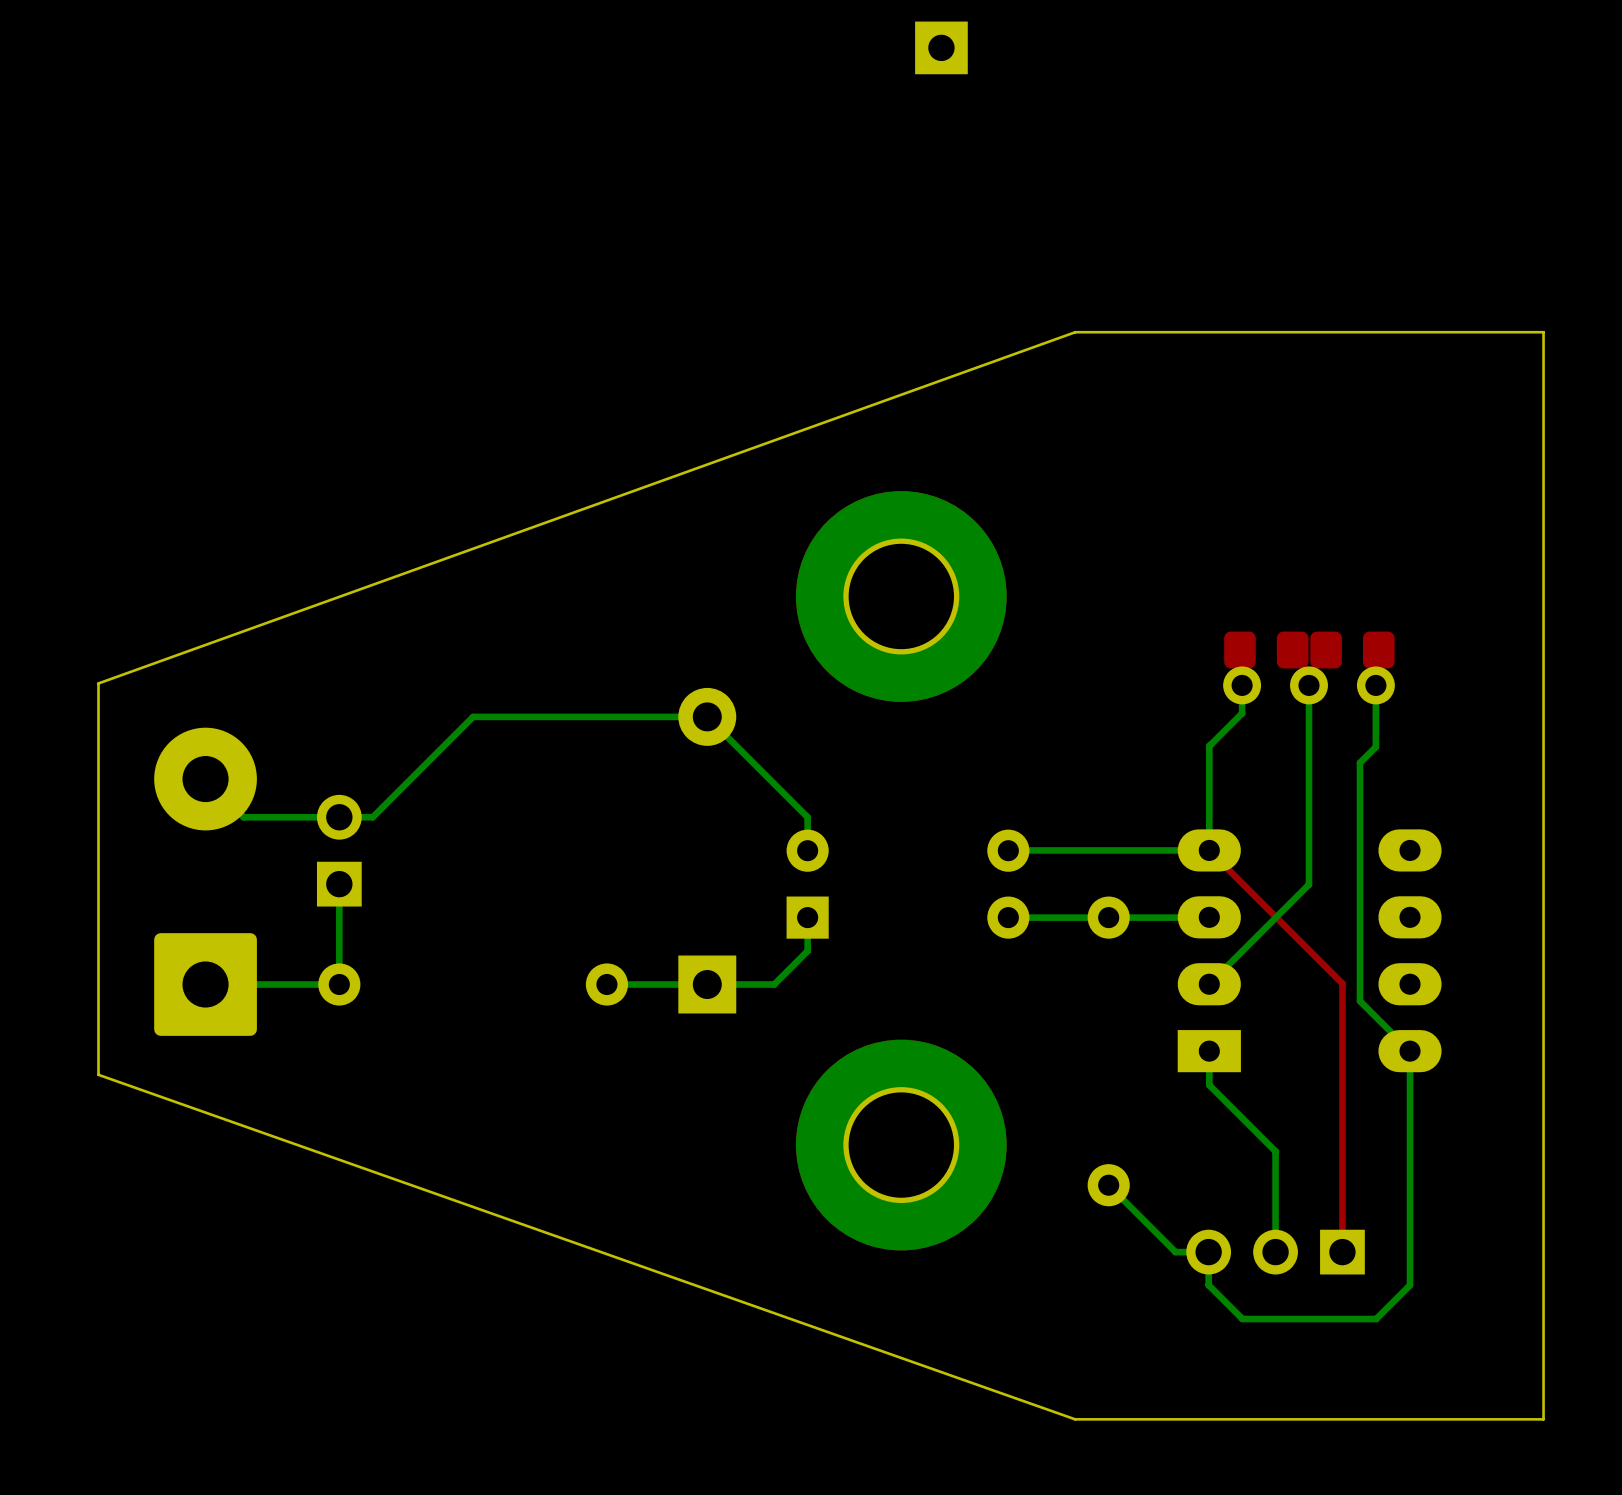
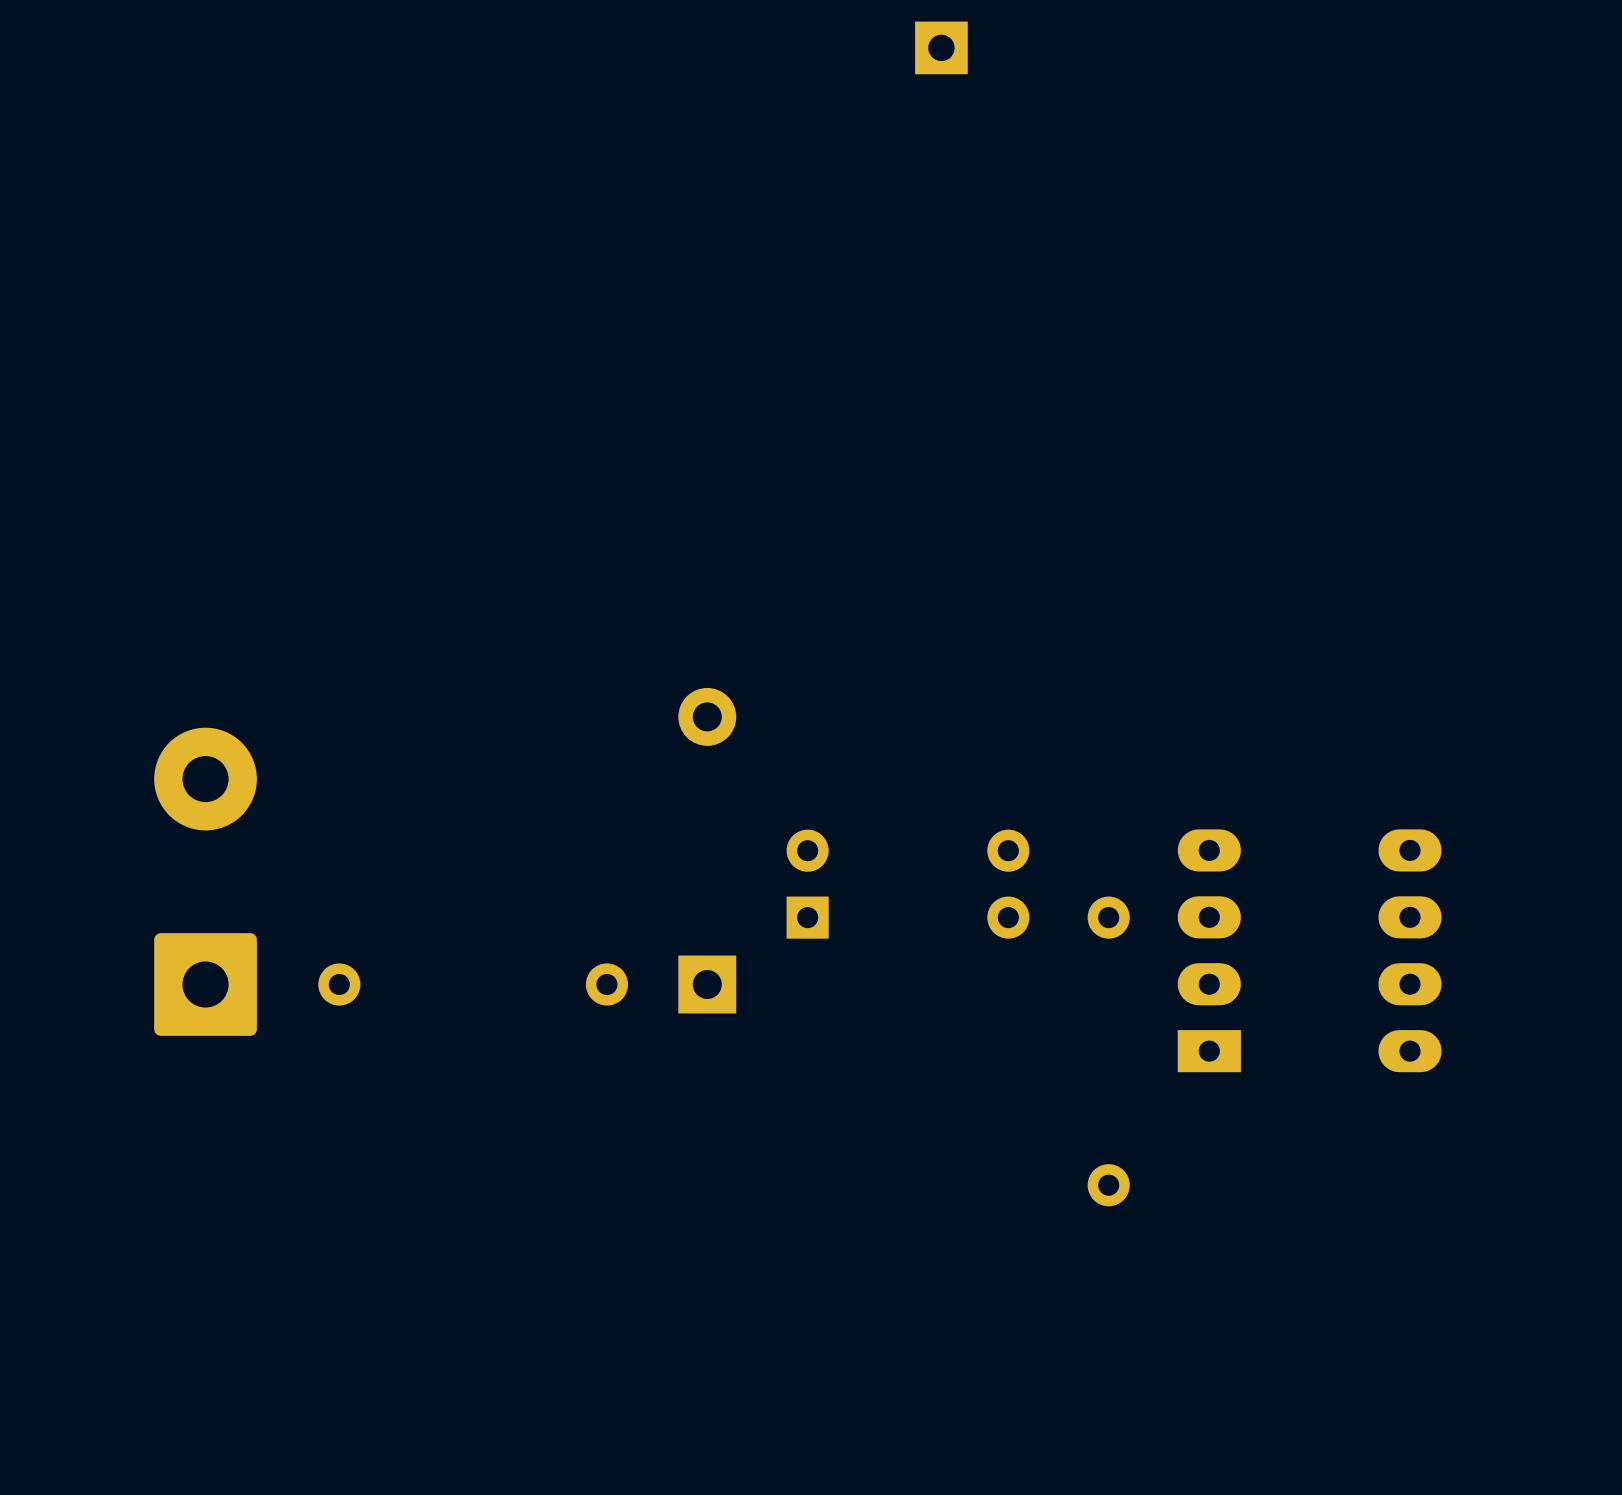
board edge: (1543, 332) (1543, 1419) (1075, 1419) (98, 1074) (98, 683) (1075, 332) (1543, 332) -> none
part: (901, 596) -> none
part: (1266, 650) -> none
part: (1352, 650) -> none
bottom track: (1242, 685) (1242, 713) (1209, 746) (1209, 850) (1008, 850) -> none
bottom track: (1309, 685) (1309, 884) (1209, 984) -> none
part: (1309, 685) -> none
bottom track: (1375, 685) (1375, 746) (1359, 762) (1359, 1001) (1410, 1051) (1410, 1285) (1376, 1319) (1242, 1319) (1208, 1285) (1208, 1252) (1175, 1252) (1108, 1185) -> none
bottom track: (205, 779) (243, 817) (372, 817) (473, 716) (707, 716) (807, 817) (807, 850) -> none
part: (339, 850) -> none
top track: (1209, 850) (1342, 983) (1342, 1252) -> none
bottom track: (339, 884) (339, 984) (205, 984) -> none
bottom track: (807, 917) (807, 951) (774, 984) (606, 984) -> none
bottom track: (1209, 917) (1008, 917) -> none
bottom track: (1209, 1051) (1209, 1085) (1275, 1151) (1275, 1252) -> none
part: (901, 1145) -> none
part: (1275, 1252) -> none

